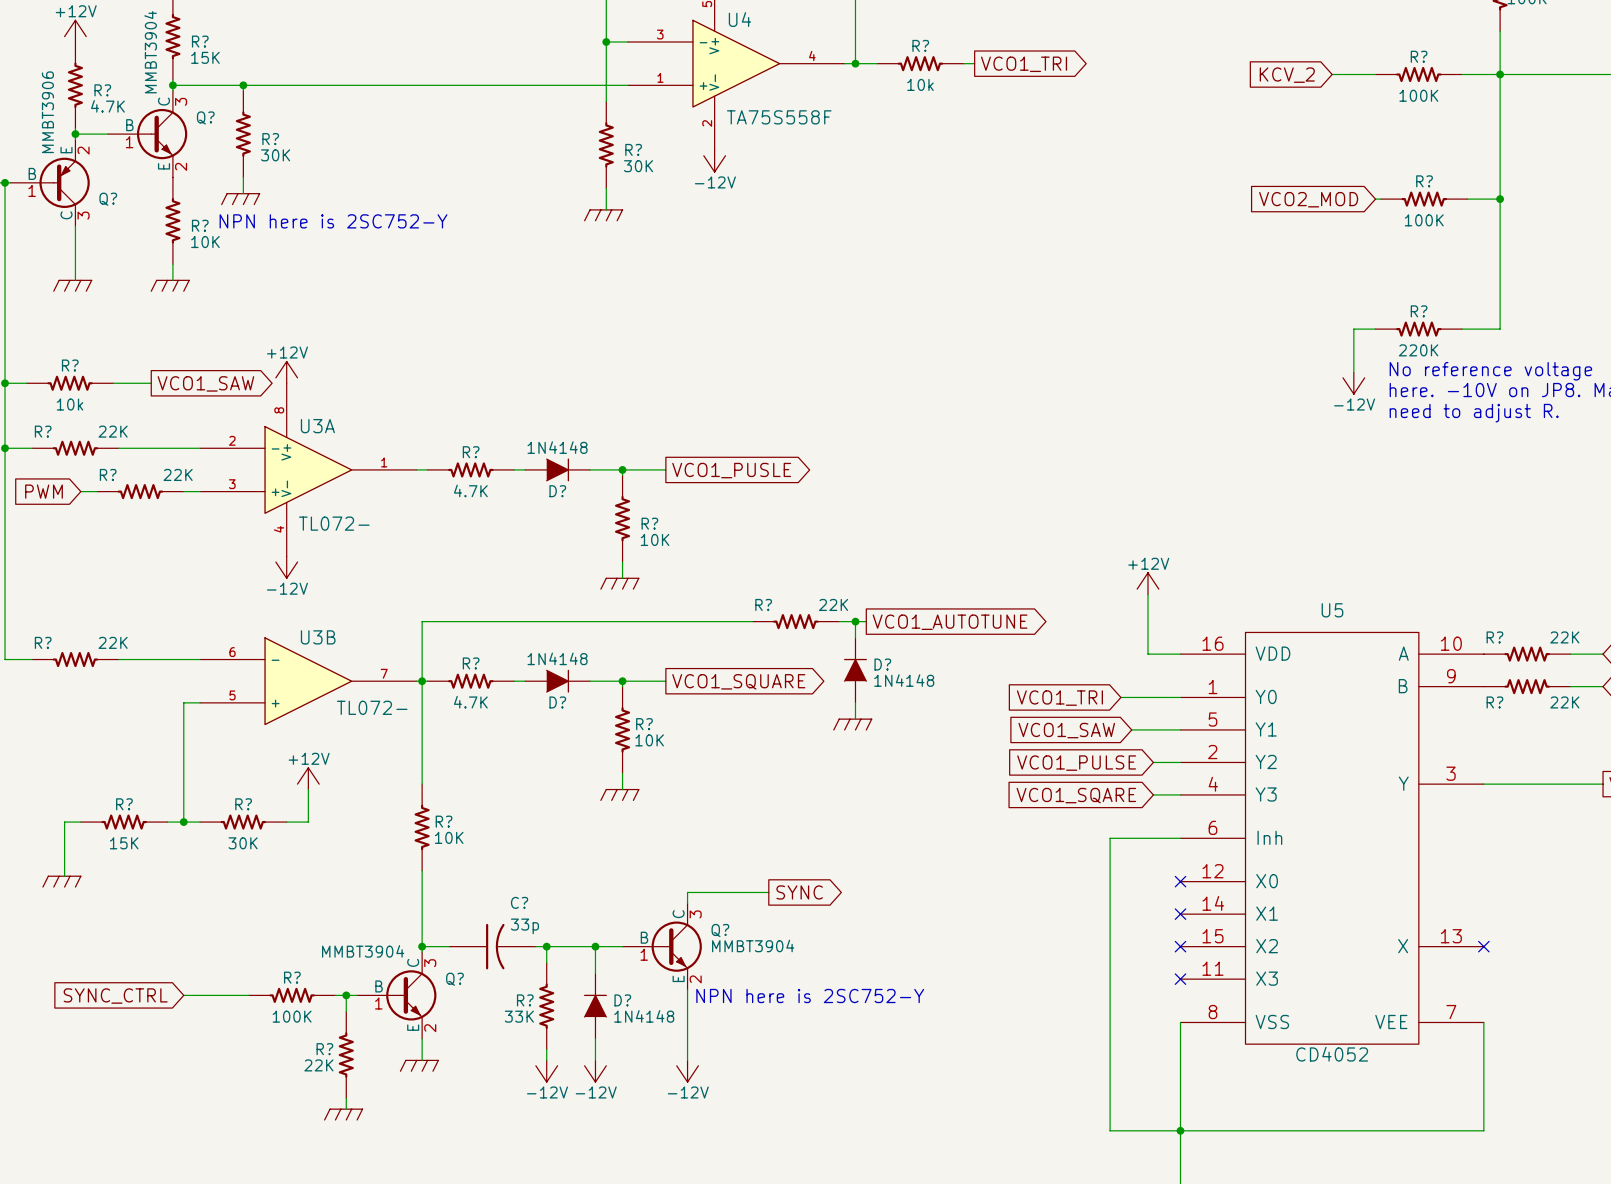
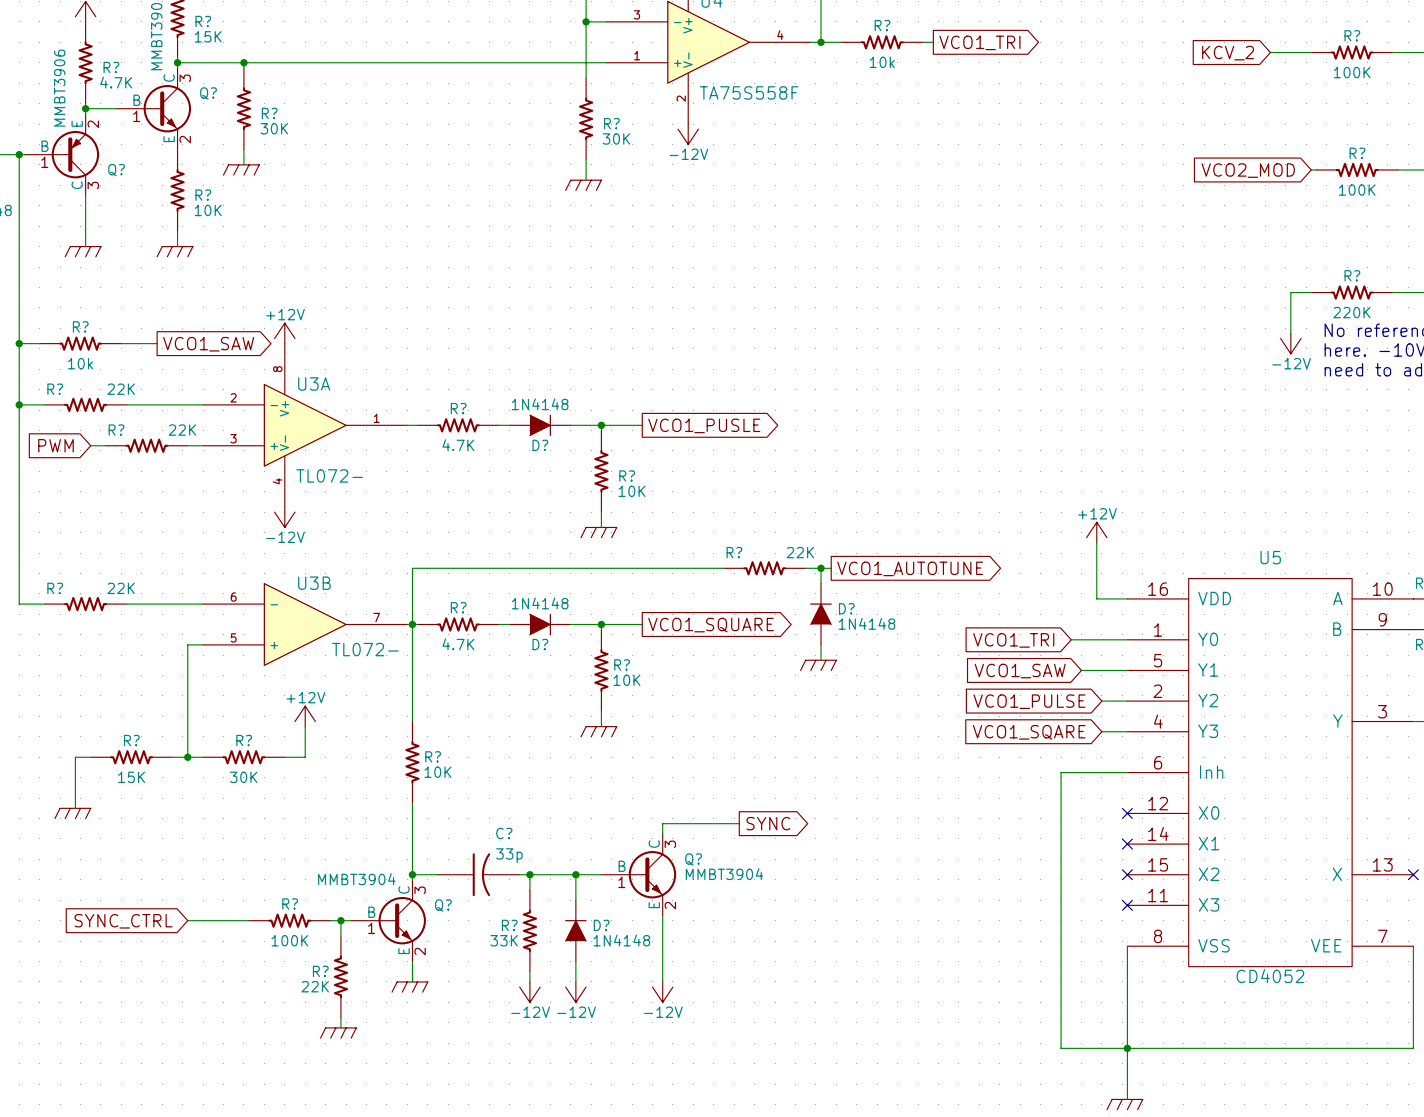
text: NPN here is 2SC752-Y (333, 221) -> none
text: NPN here is 2SC752-Y (810, 996) -> none

